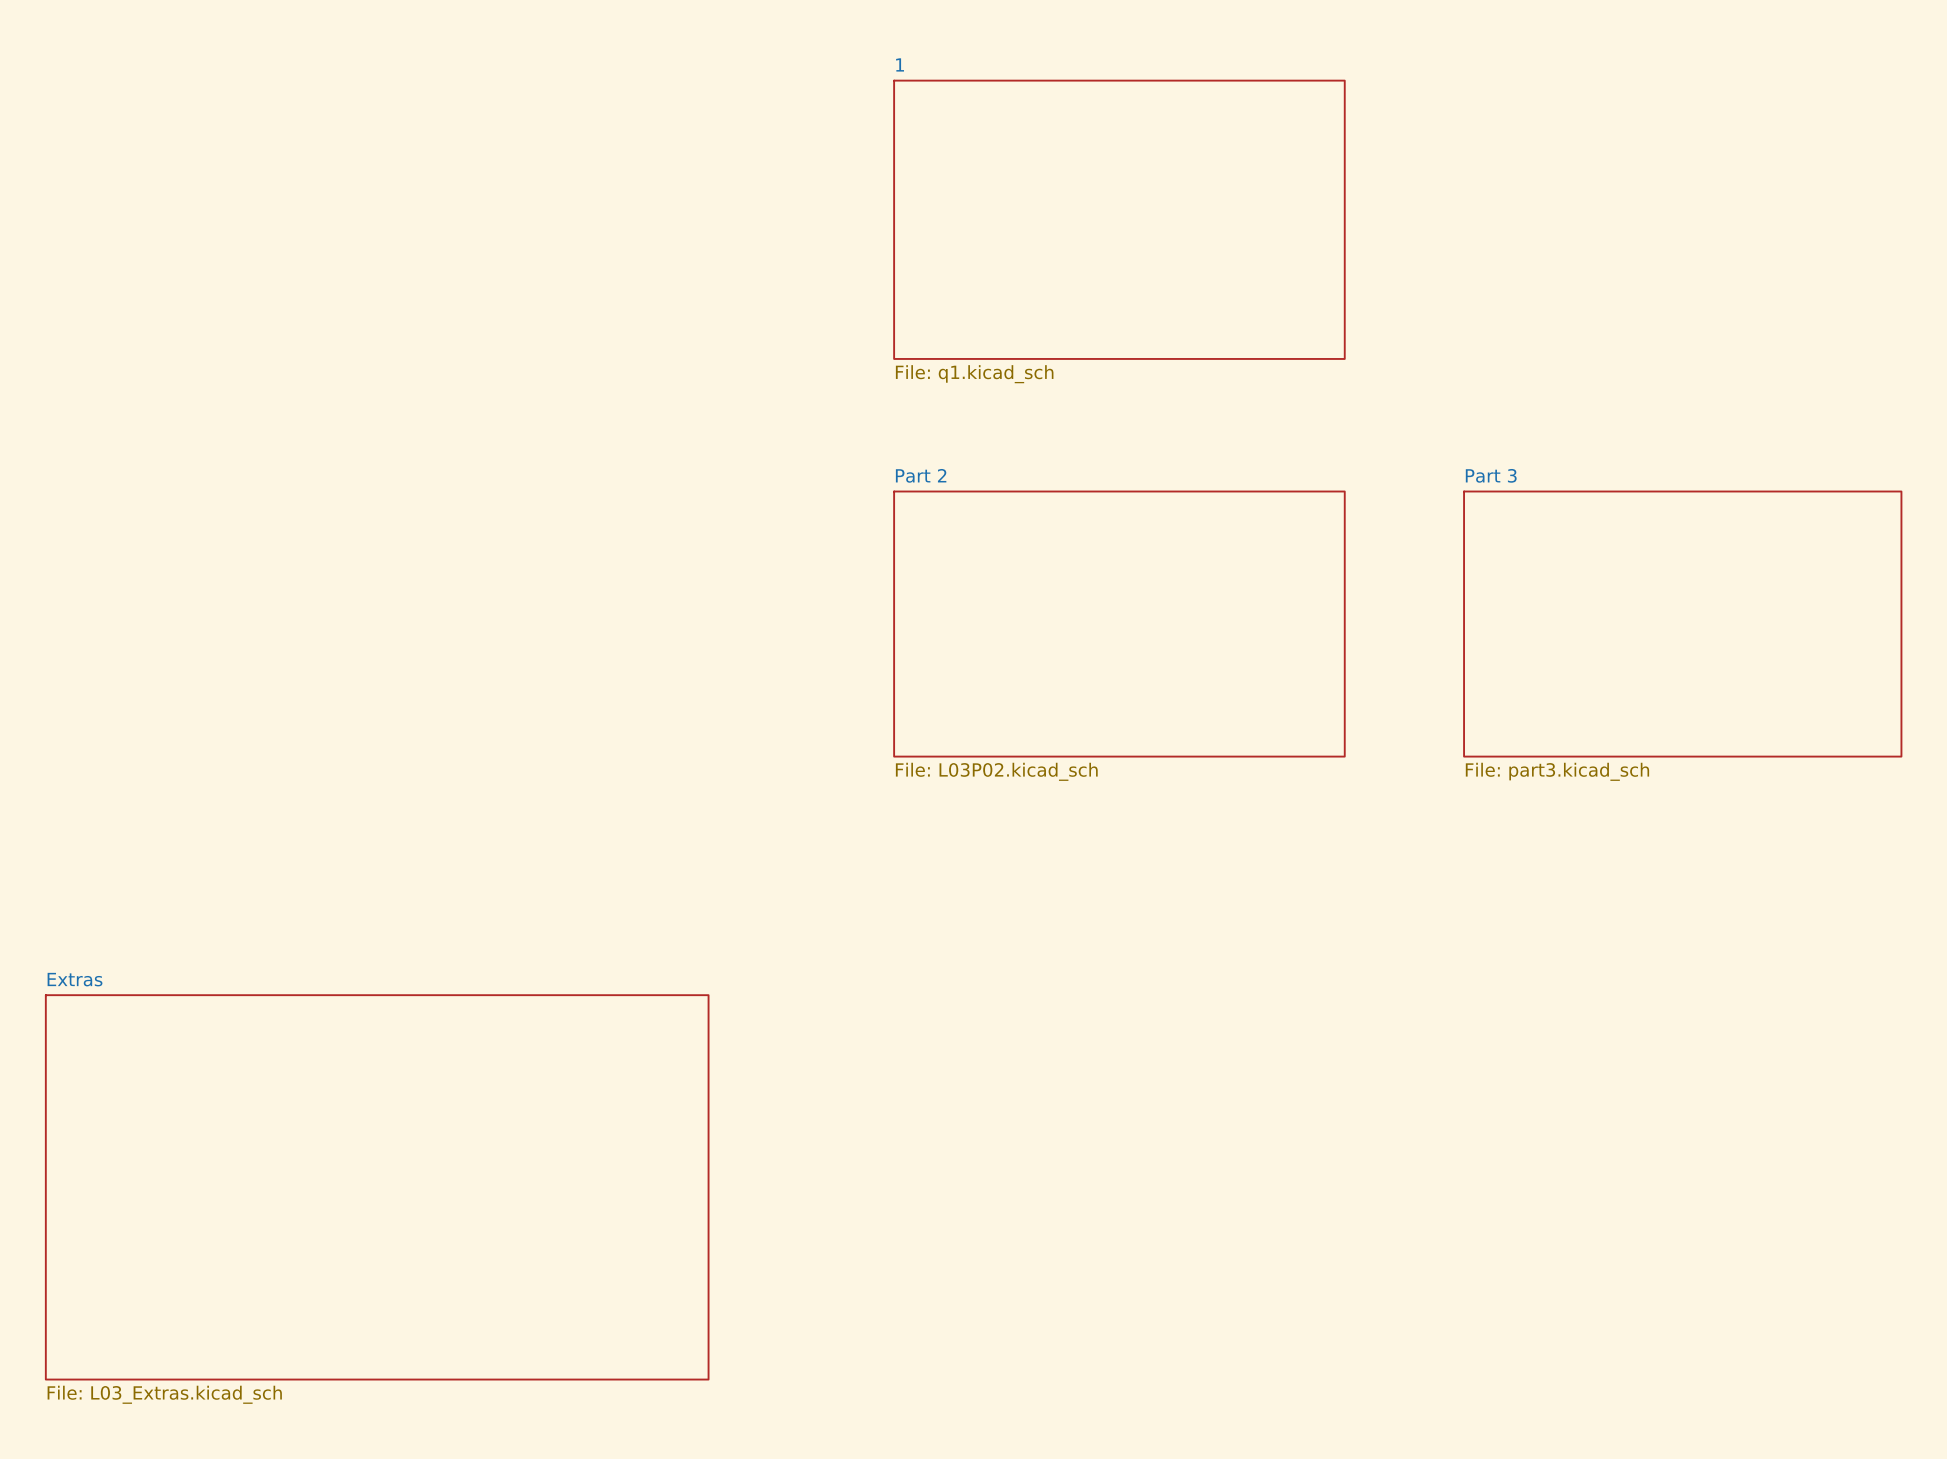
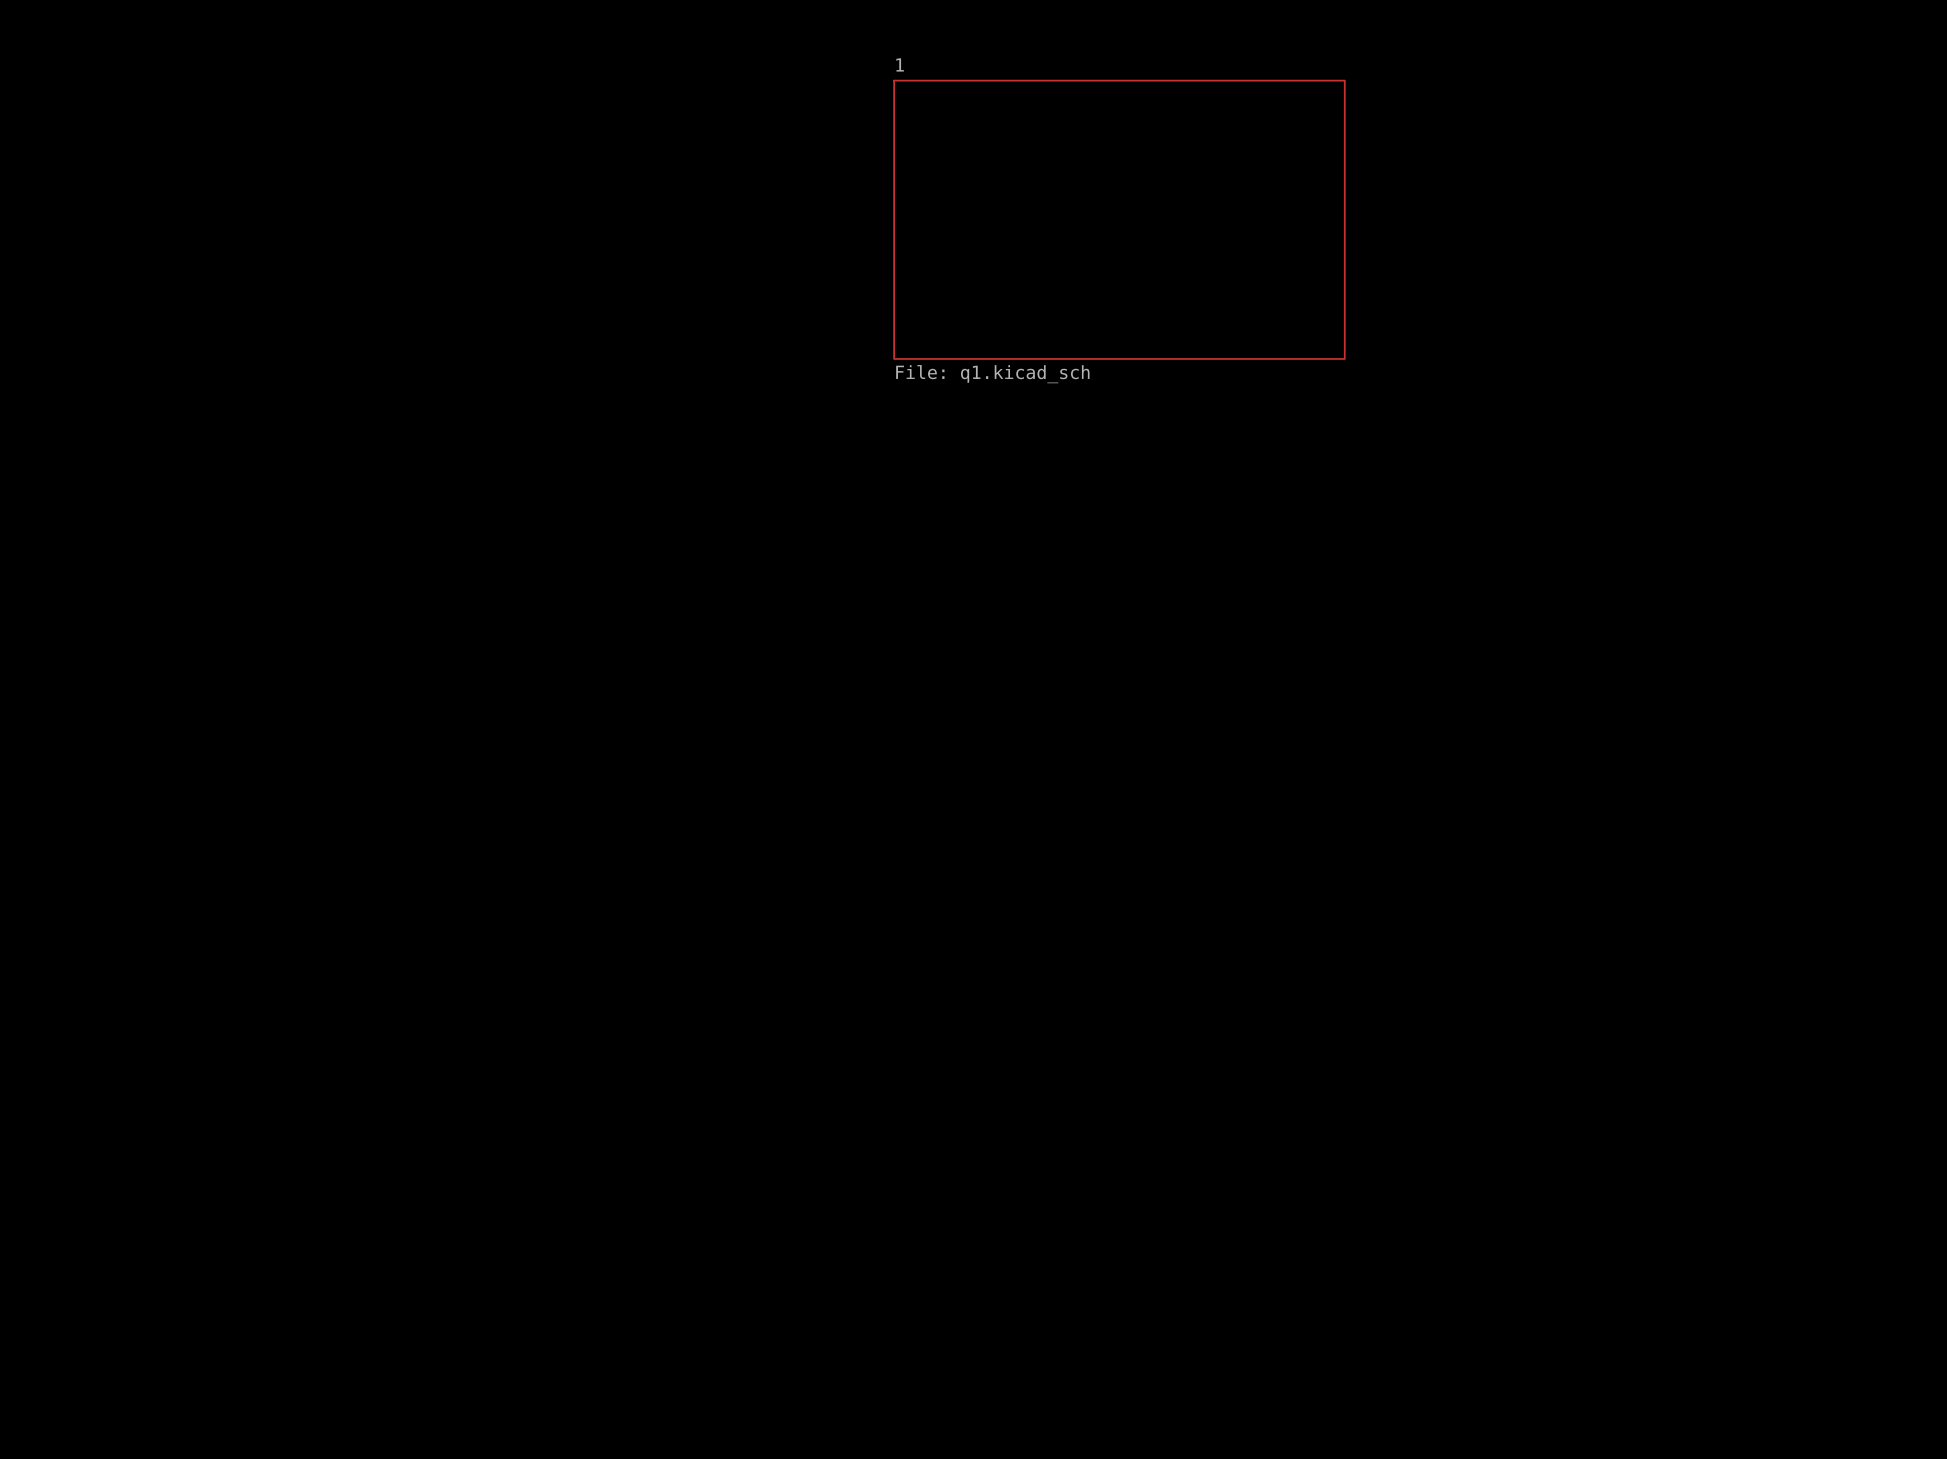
sheet Part 2: File: L03P02.kicad_sch (1119, 624) -> none
sheet Part 3: File: part3.kicad_sch (1682, 624) -> none
sheet Extras: File: L03_Extras.kicad_sch (377, 1187) -> none

